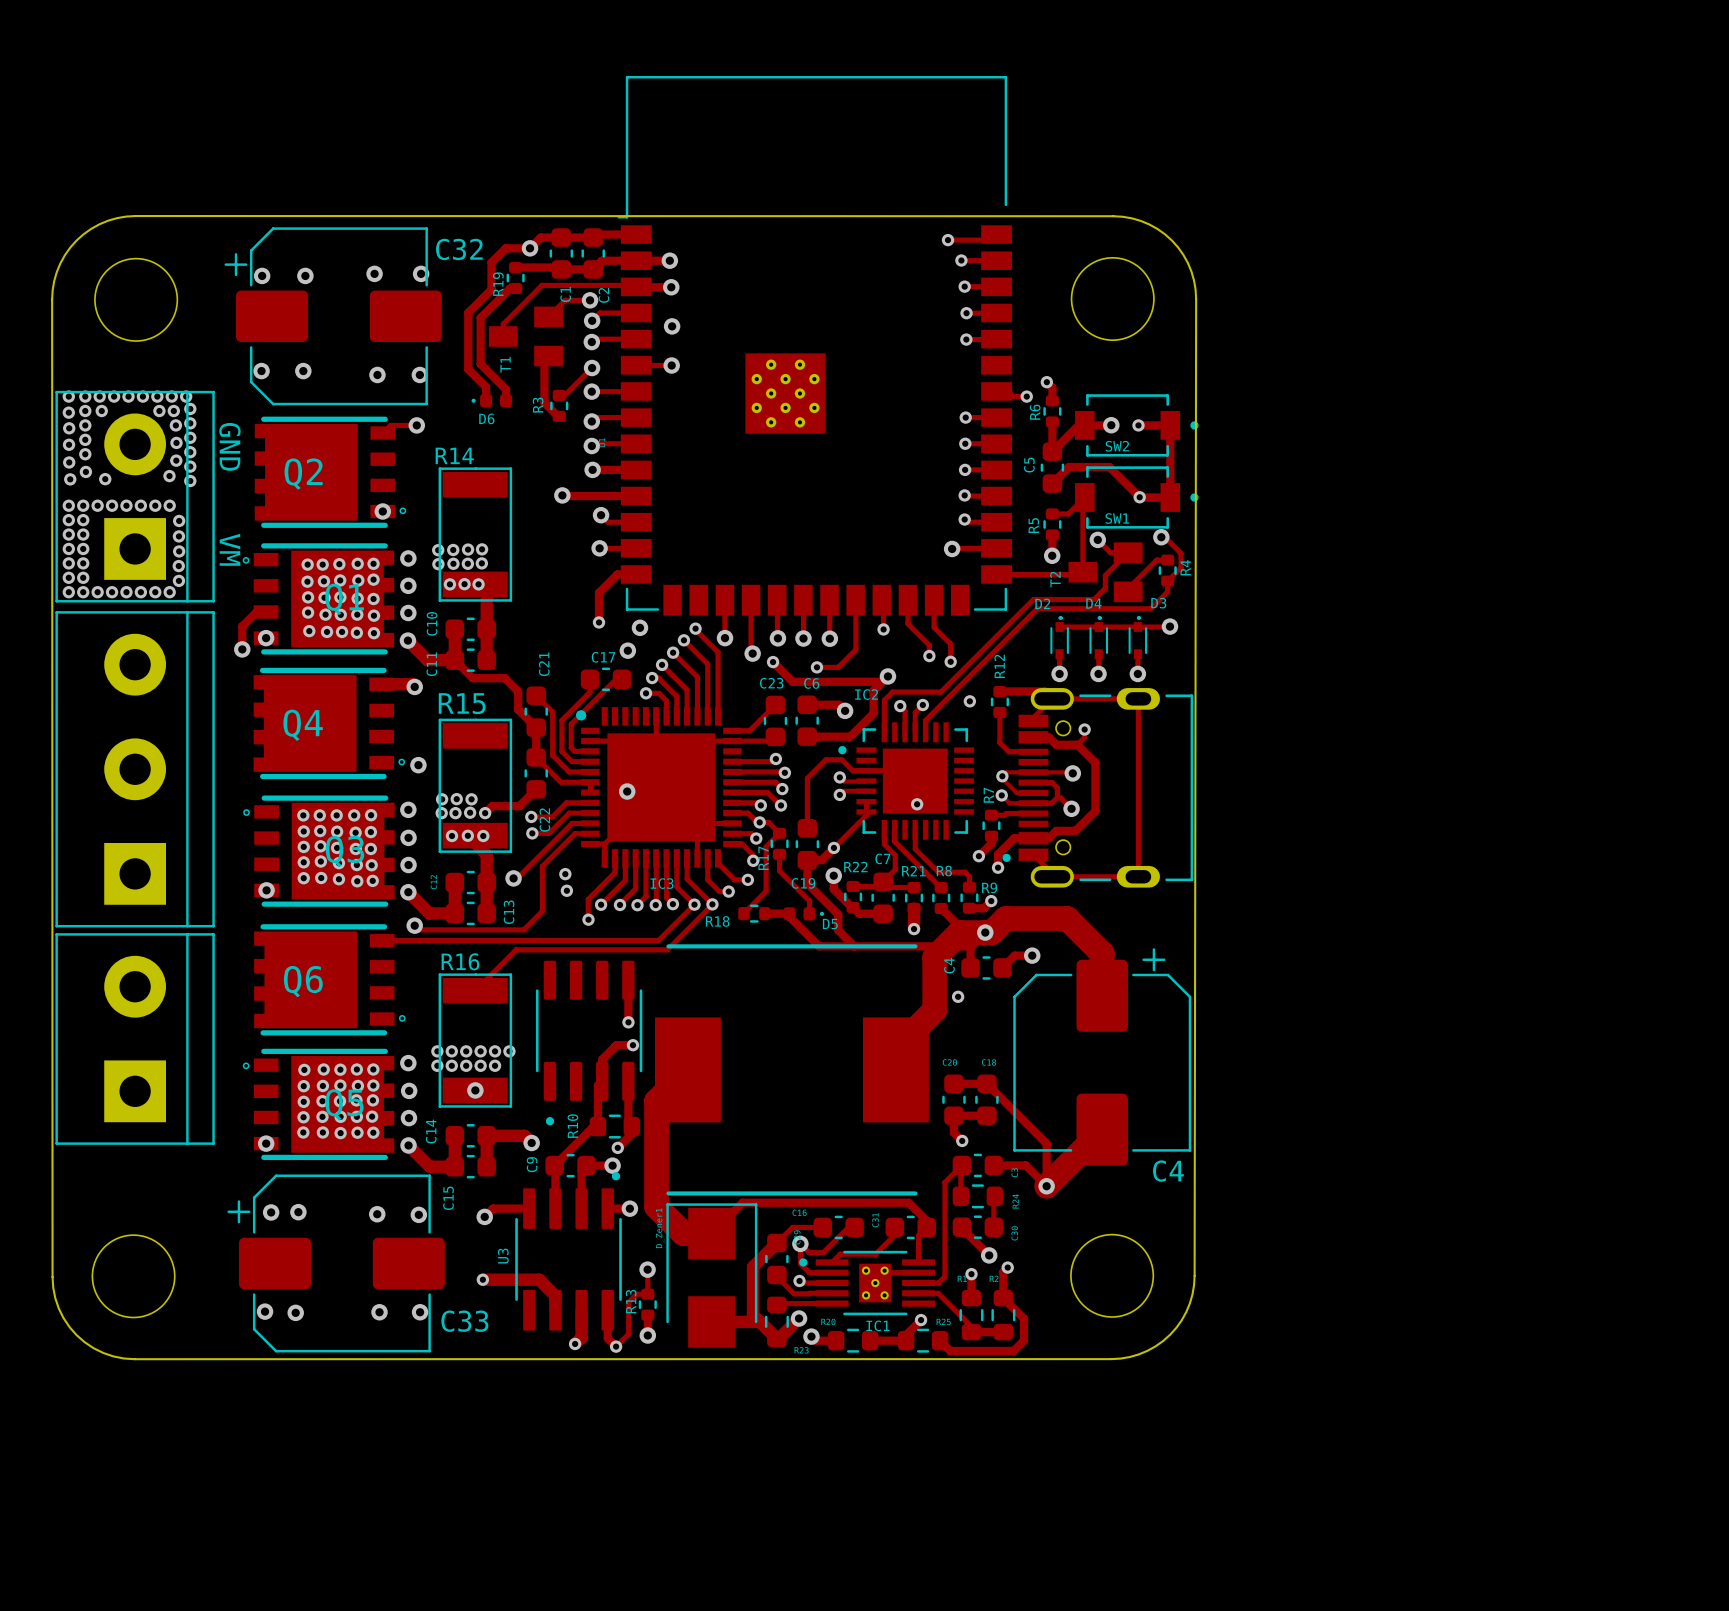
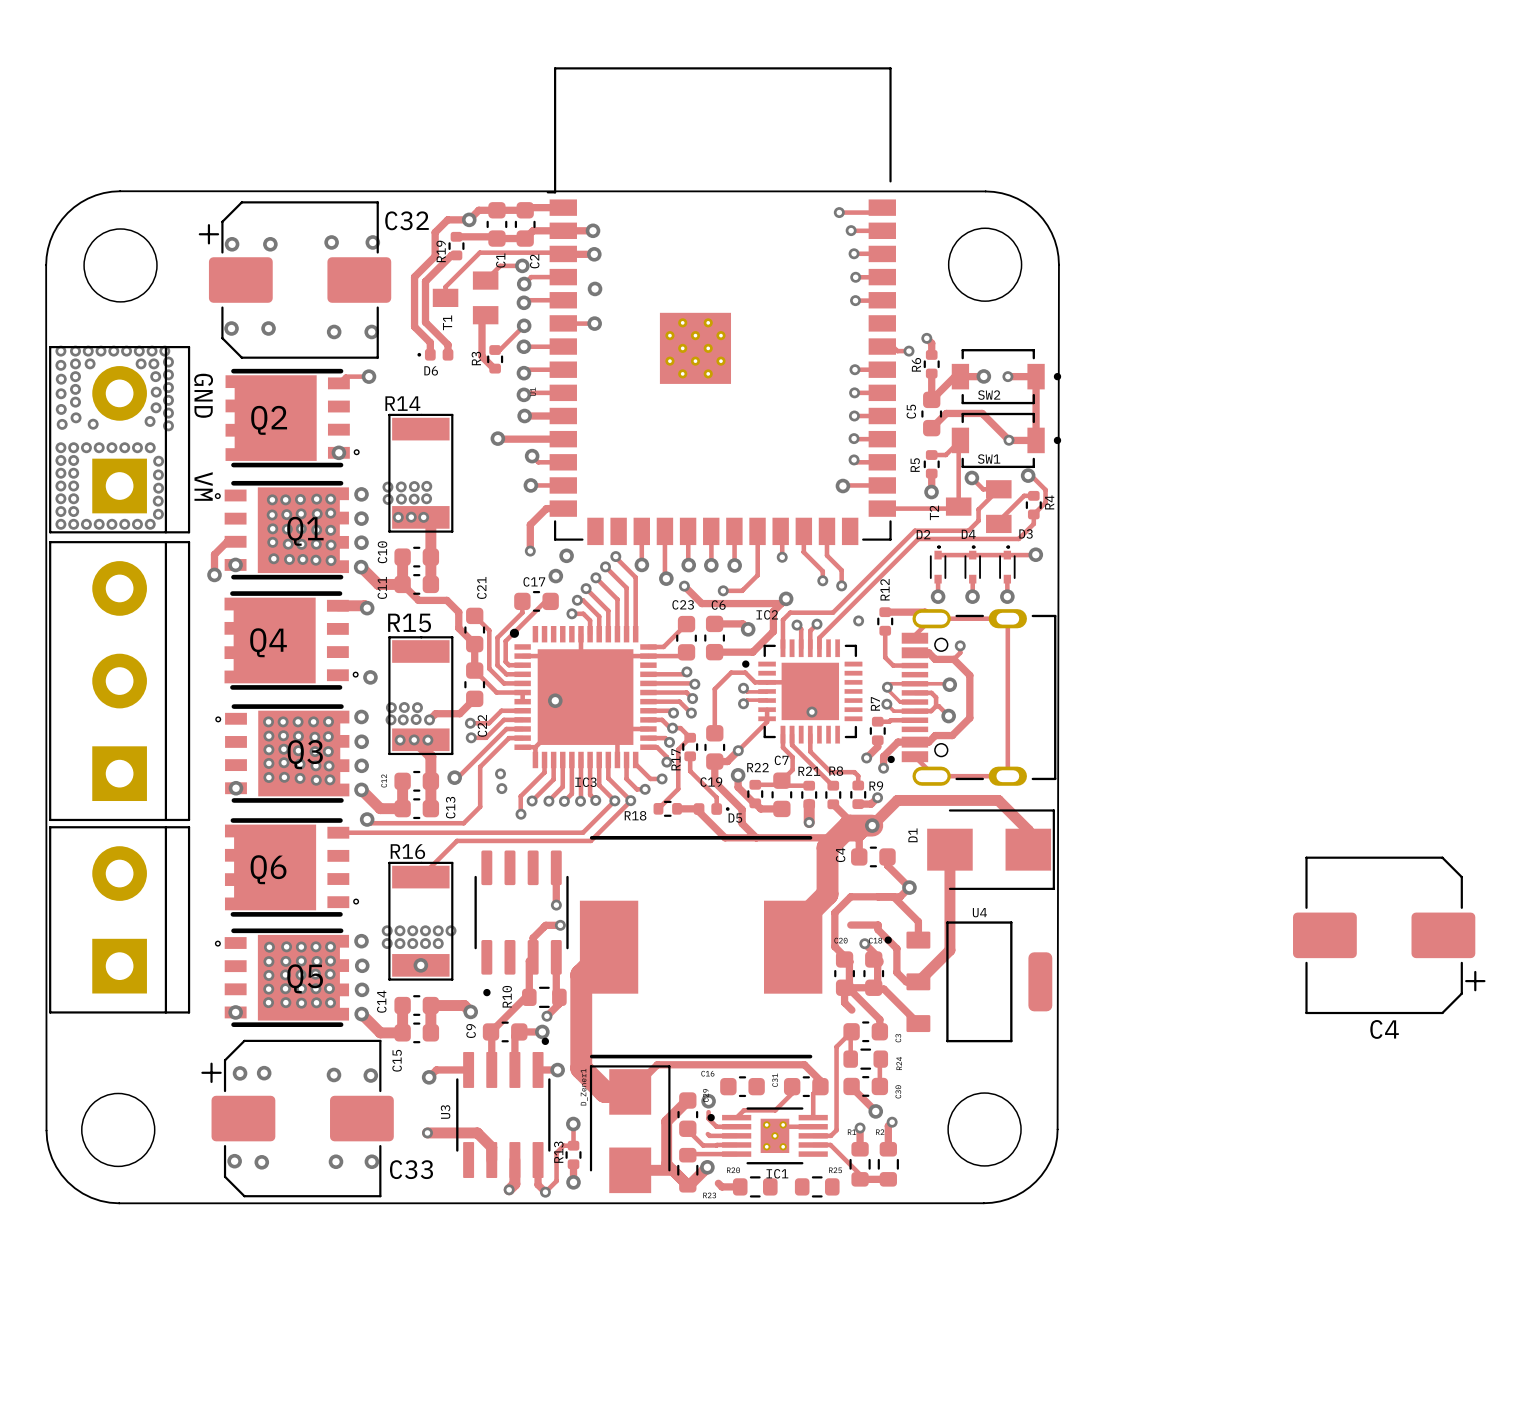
track: (985, 932) (991, 932) (1005, 918) (1067, 918) (1102, 953) (1102, 995) -> (872, 825) (897, 800) (998, 800) (1028, 830) (1028, 849)
track: (1032, 955) (1014, 955) (1002, 967) -> (879, 1031) (879, 1019) (849, 989) (849, 961) (834, 946) (834, 912) (850, 896) (900, 896) (909, 887) (887, 865) (887, 856)
via position: (1032, 955) -> (909, 887)
track: none -> (949, 849) (949, 950) (918, 981) (906, 981) (896, 972) (896, 948) (878, 929) (878, 925) (850, 925)
D1: none -> (991, 849)
via: (958, 996) -> none
track: none -> (893, 896) (918, 921) (918, 940)
C4 rotation: 0° (1102, 1056) -> 90° clockwise (1389, 935)
C4 position: (1102, 1056) -> (1389, 935)
track: none -> (864, 943) (878, 957) (877, 989) (883, 989) (918, 1023)
via: none -> (864, 943)
track: (953, 1083) (986, 1083) (1046, 1143) (1046, 1186) -> none
U4: none -> (968, 981)
track: (1102, 1129) (1046, 1186) -> none
via: (962, 1140) -> none
track: (993, 1165) (1025, 1165) (1046, 1186) -> none
C4 name position: C4 (1168, 1171) -> C4 (1384, 1029)
via: (1046, 1186) -> none
track: (822, 1227) (792, 1227) (776, 1243) -> none
track: (854, 1227) (848, 1227) (823, 1252) (809, 1252) (800, 1243) (800, 1256) -> none
via: (799, 1280) -> none
track: (1003, 1298) (1024, 1318) (1024, 1340) (1013, 1350) (950, 1350) (940, 1340) -> none
track: (921, 1320) (906, 1335) (906, 1340) (870, 1340) -> none
via: (921, 1320) -> none
via: (811, 1336) -> none

